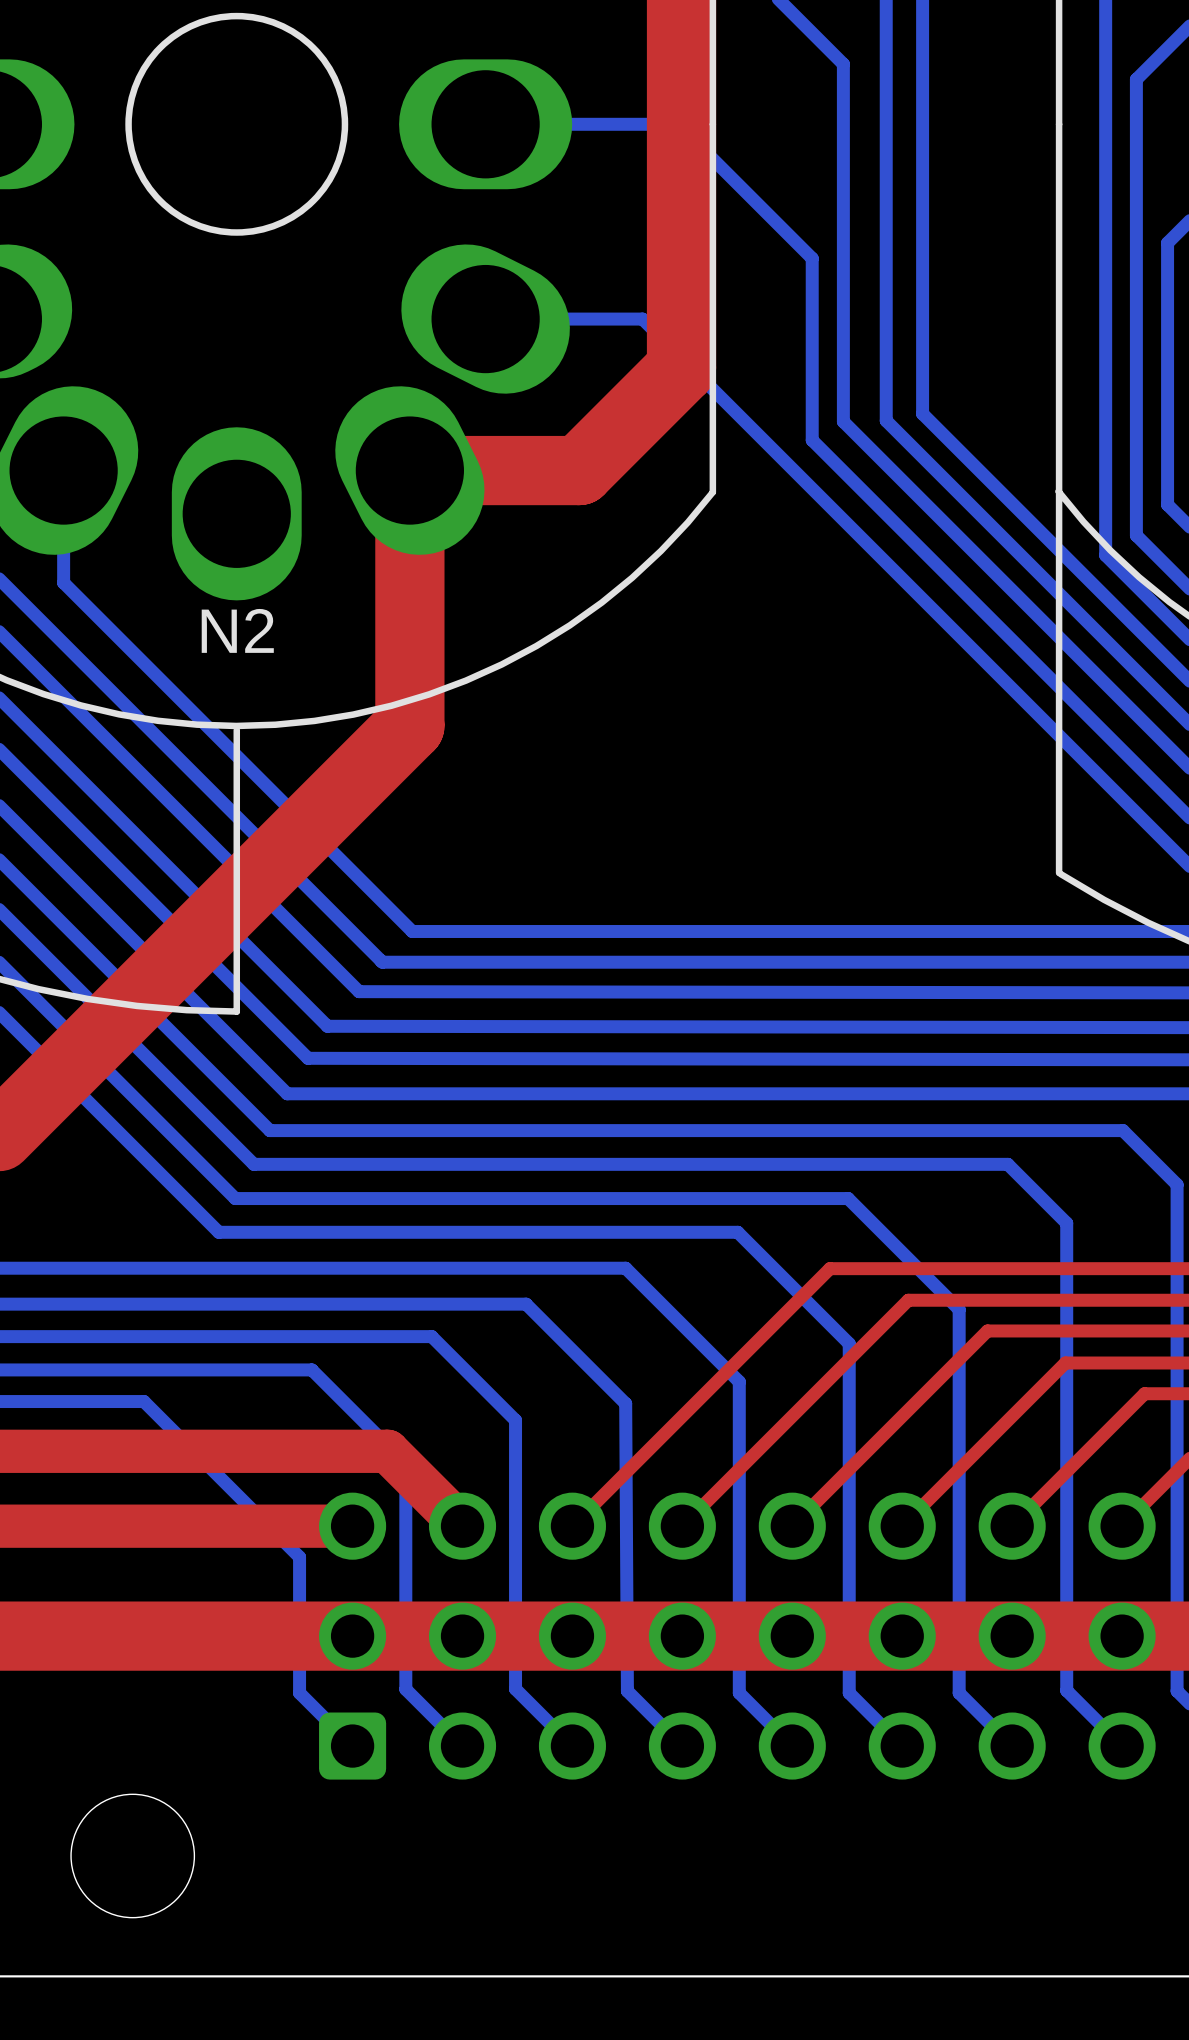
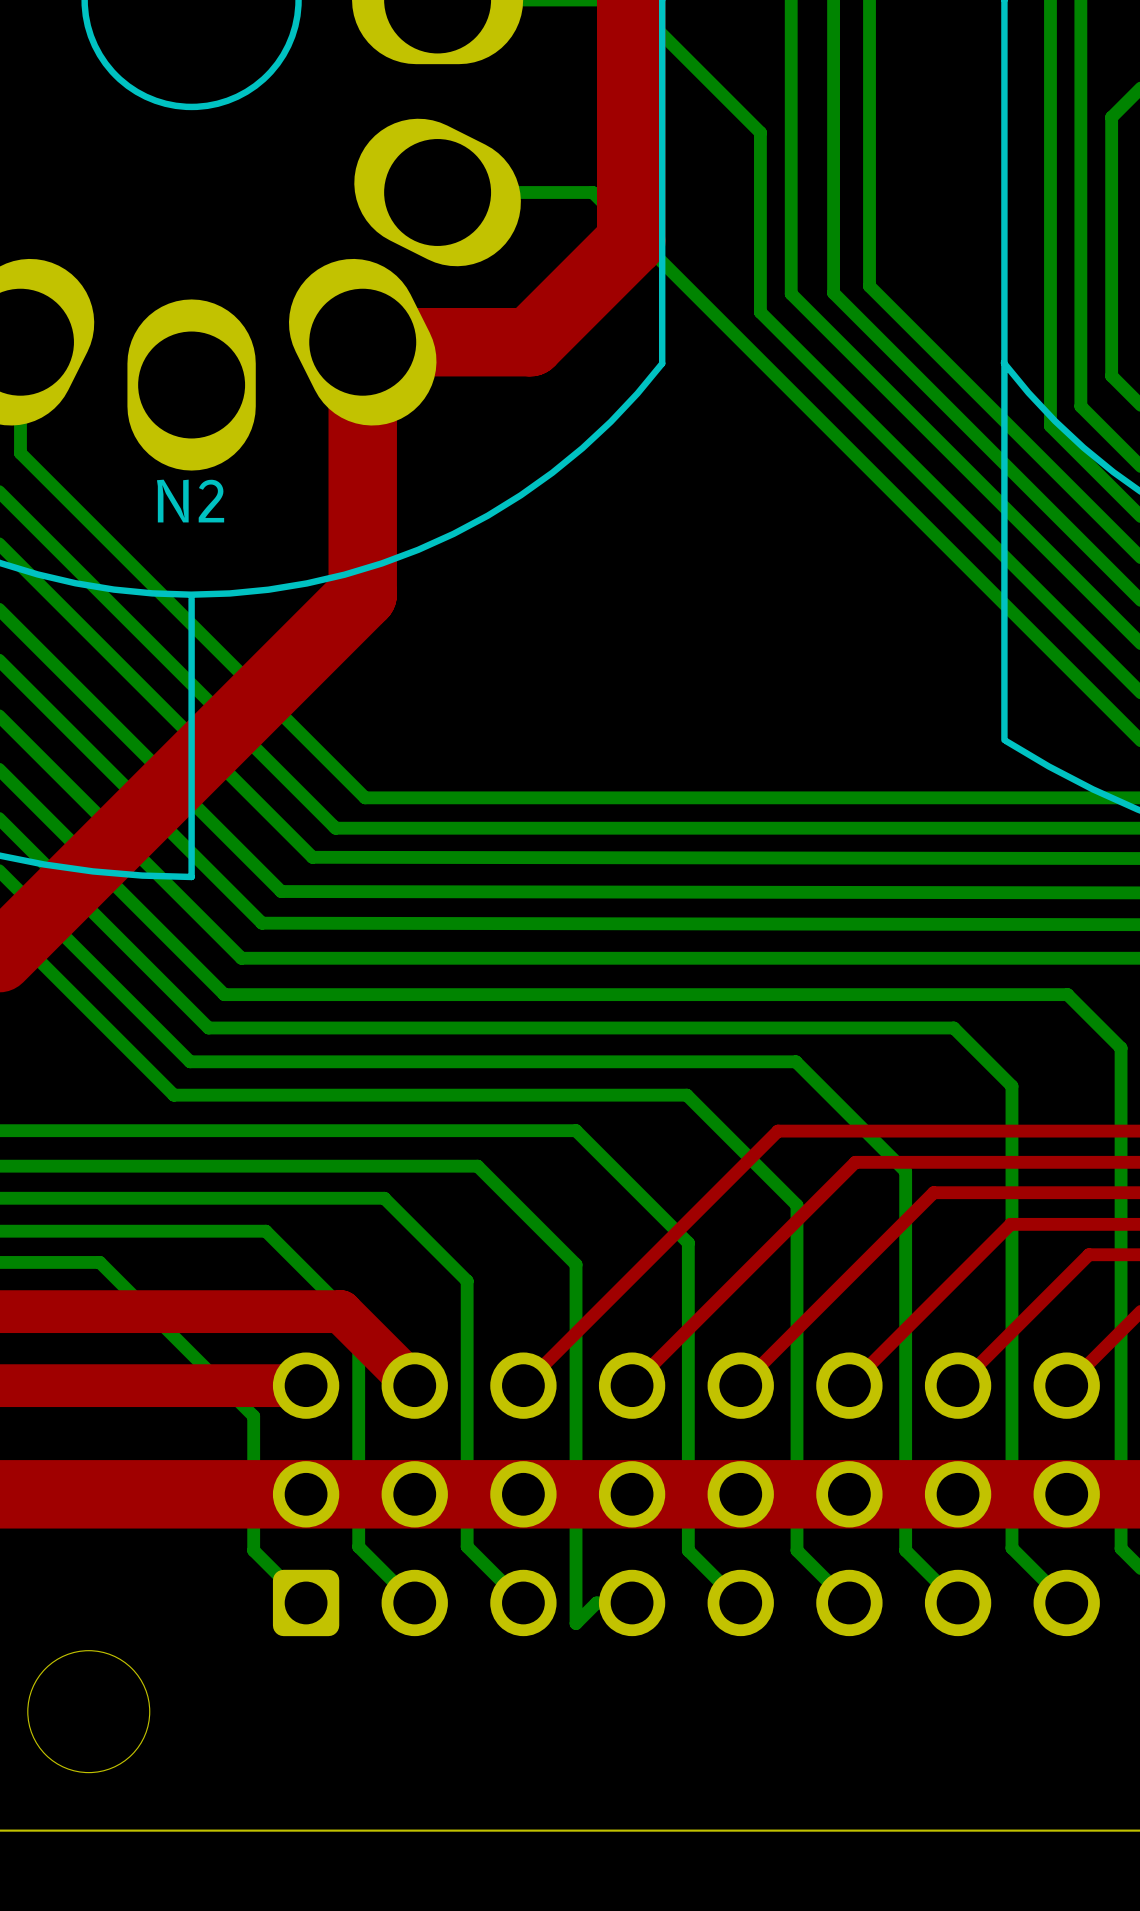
bottom track: (625, 1403) (627, 1691) (682, 1746) -> (576, 1264) (576, 1623) (596, 1602) (632, 1602)

